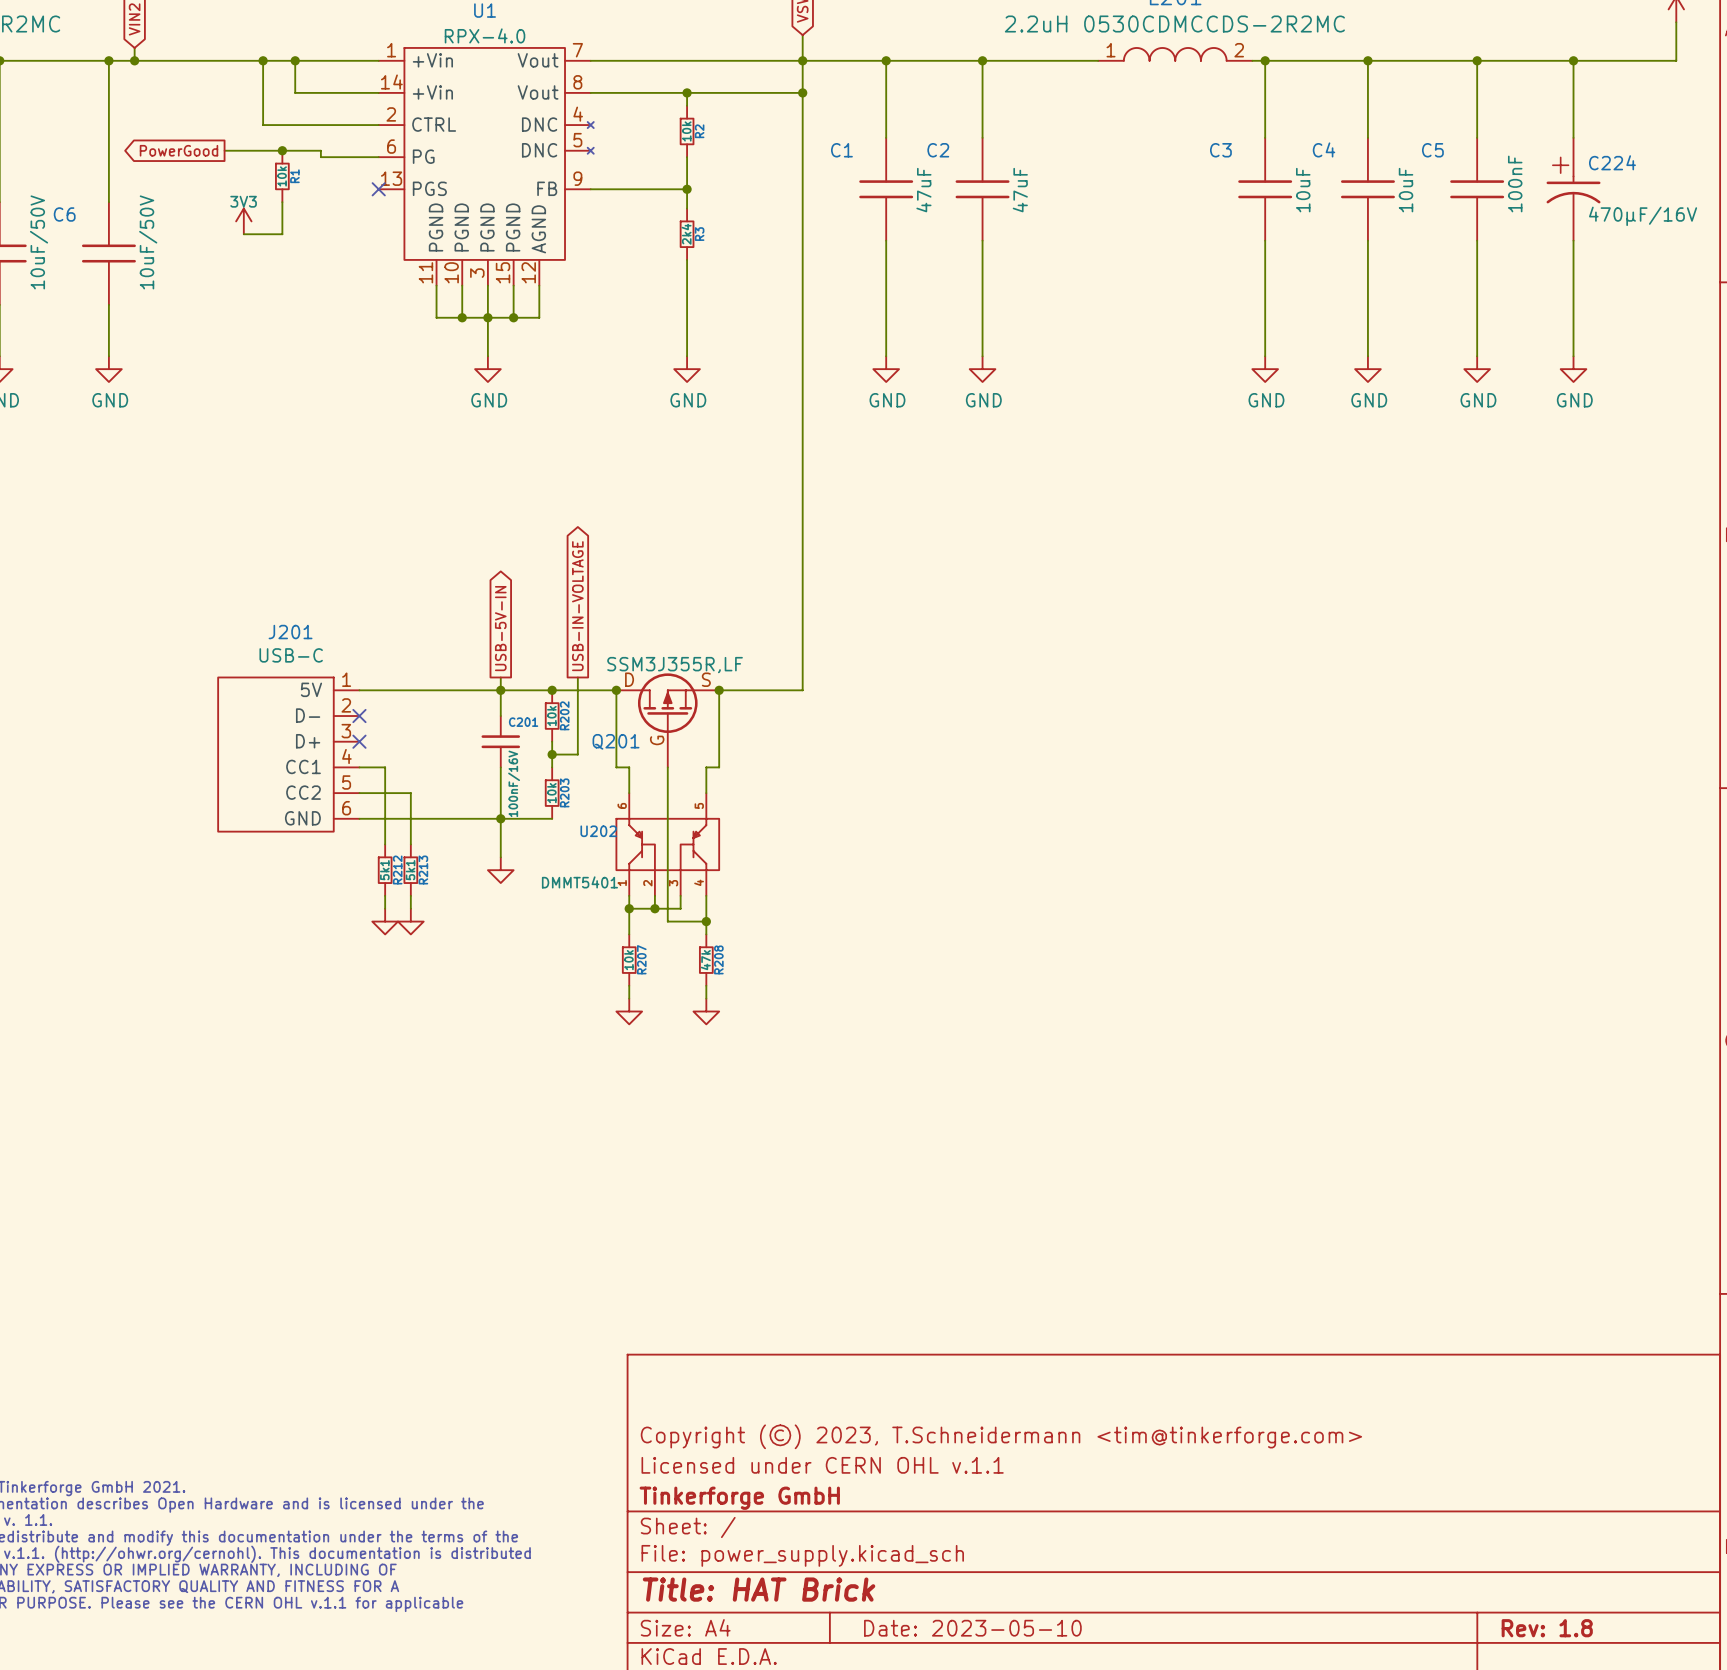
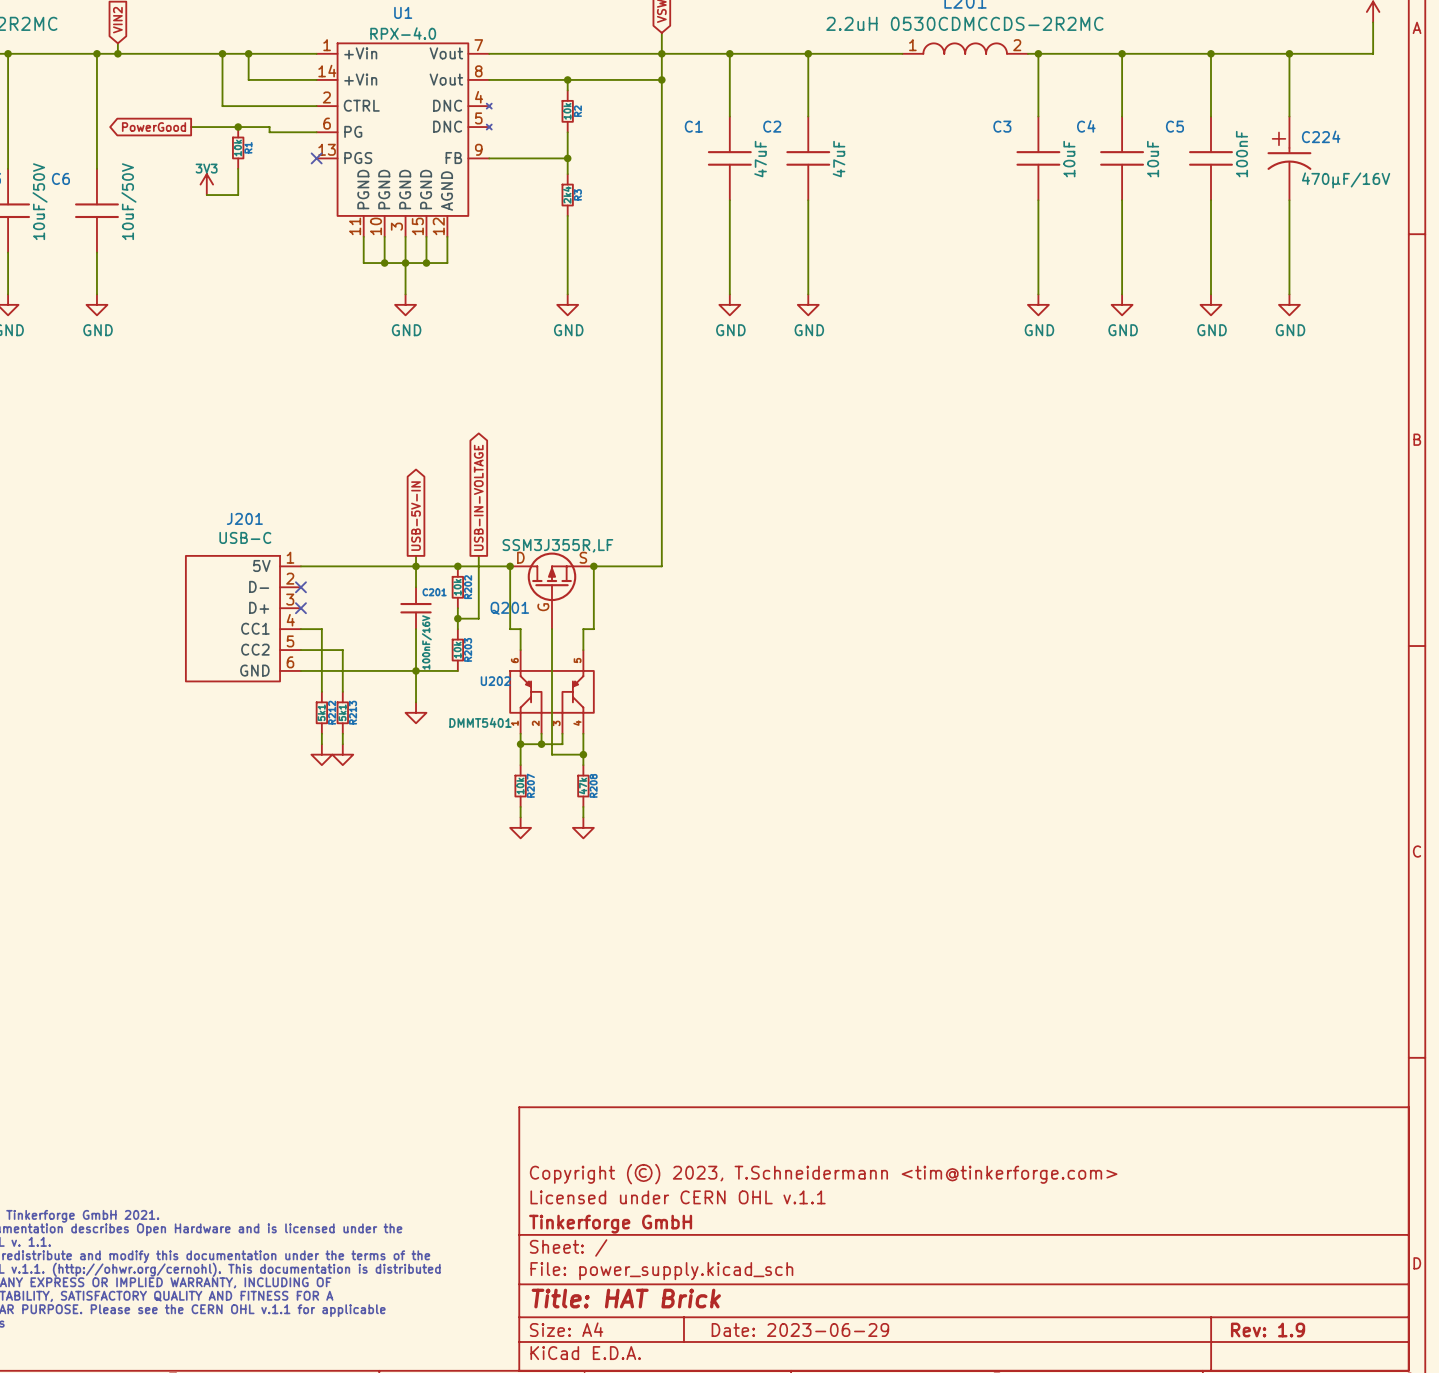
title block: Date: 2023-05-10 (972, 1628) -> Date: 2023-06-29 (800, 1330)
title block: Rev: 1.8 (1547, 1628) -> Rev: 1.9 (1268, 1330)

